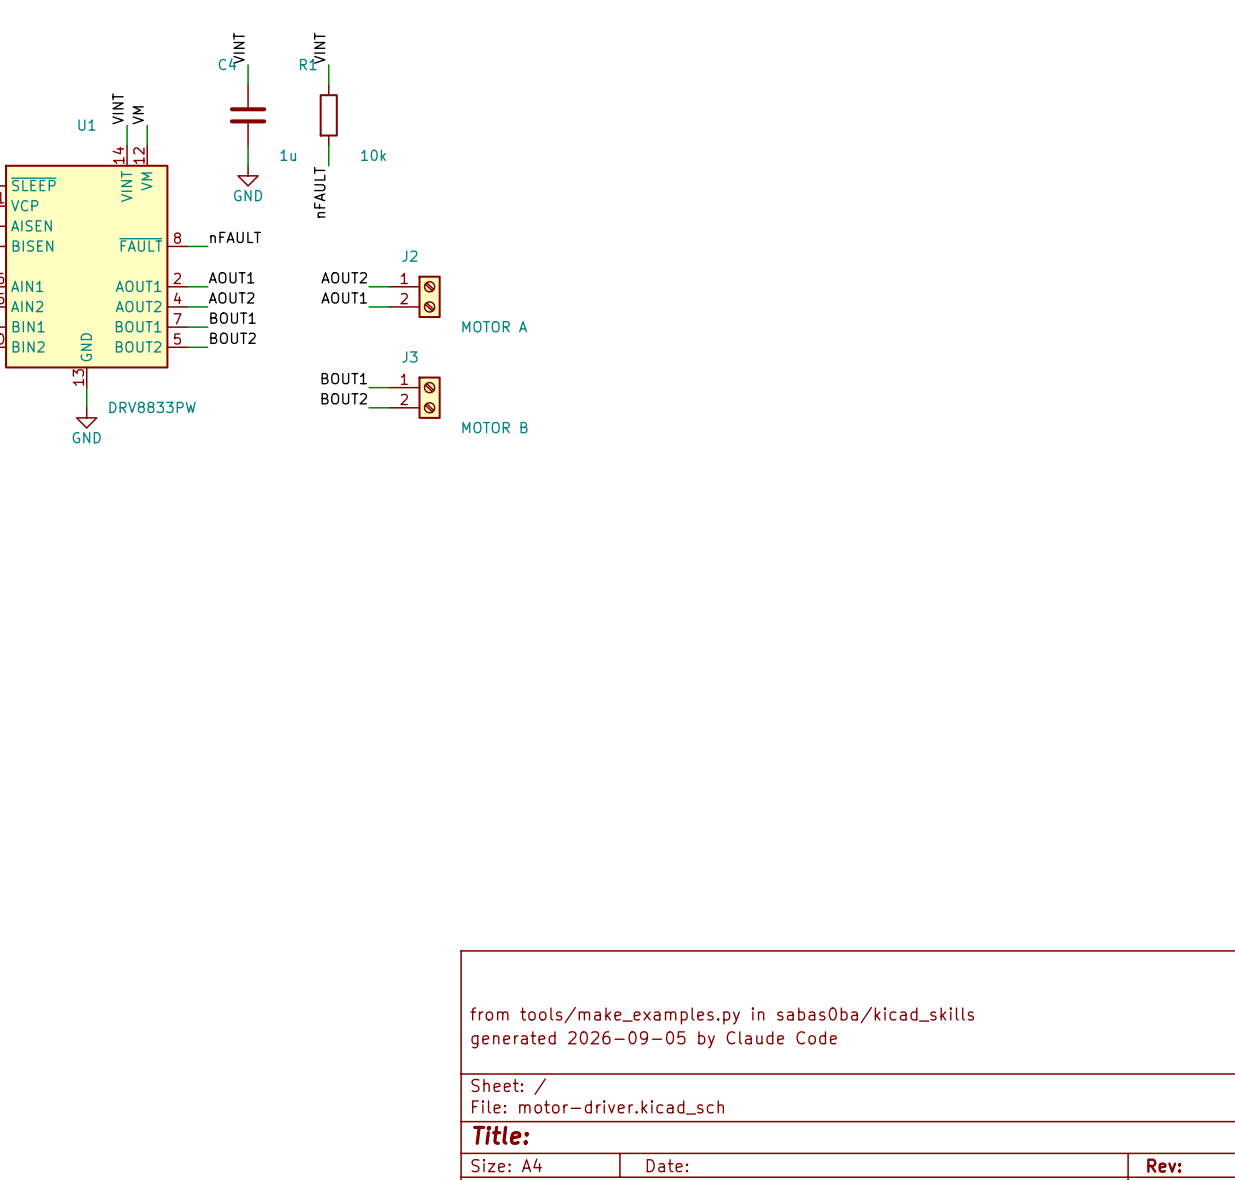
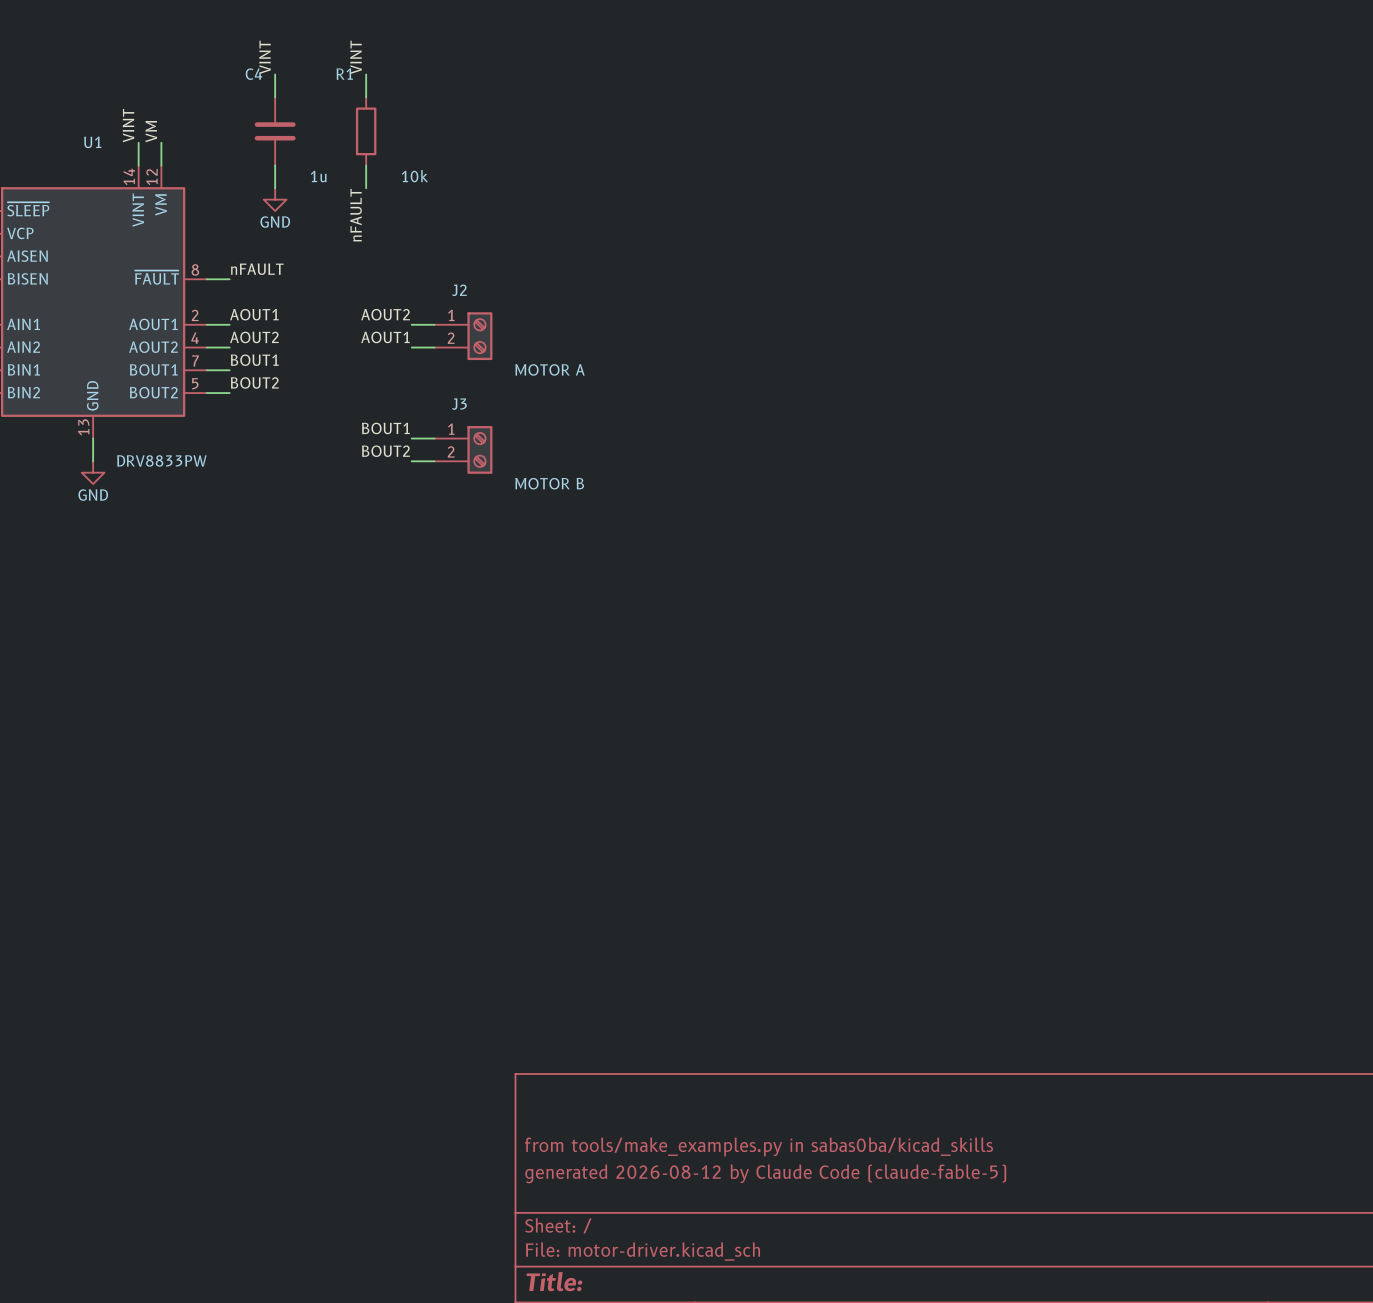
title block: generated 2026-09-05 by Claude Code (654, 1039) -> generated 2026-08-12 by Claude Code (claude-fable-5) (765, 1173)

